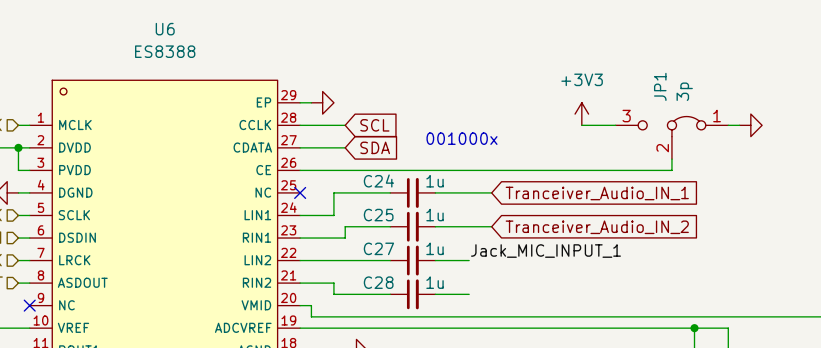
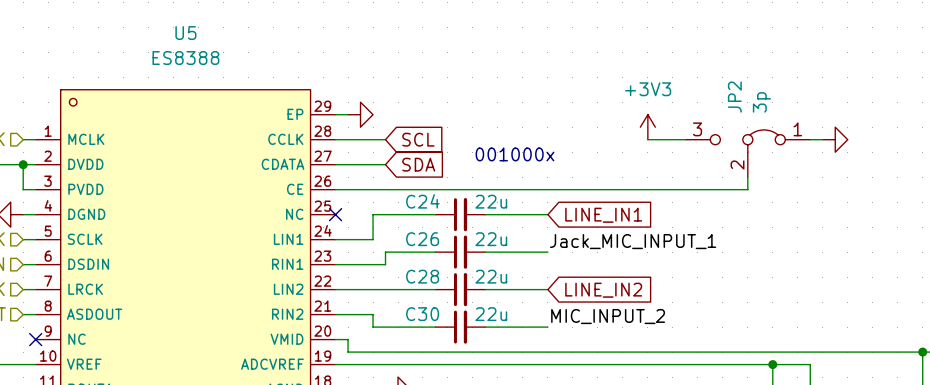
U6 name: U6 (165, 29) -> U5 (185, 33)
JP1 name: JP1 (660, 86) -> JP2 (734, 97)
C24 value: 1u (435, 181) -> 22u (491, 201)
global label: Tranceiver_Audio_IN_1 (597, 193) -> LINE_IN1 (603, 215)
C25 name: C25 (378, 215) -> C26 (422, 239)
C25 value: 1u (435, 215) -> 22u (491, 239)
global label: Tranceiver_Audio_IN_2 (597, 227) -> none
C27 name: C27 (378, 248) -> C28 (422, 276)
C27 value: 1u (435, 248) -> 22u (491, 276)
label position: Jack_MIC_INPUT_1 (545, 251) -> Jack_MIC_INPUT_1 (633, 241)
wire: none -> (522, 289) (547, 289)
global label: none -> LINE_IN2 (603, 290)
C28 name: C28 (378, 282) -> C30 (422, 314)
C28 value: 1u (435, 282) -> 22u (491, 314)
label: none -> MIC_INPUT_2 (608, 316)
wire: none -> (522, 327) (547, 327)

